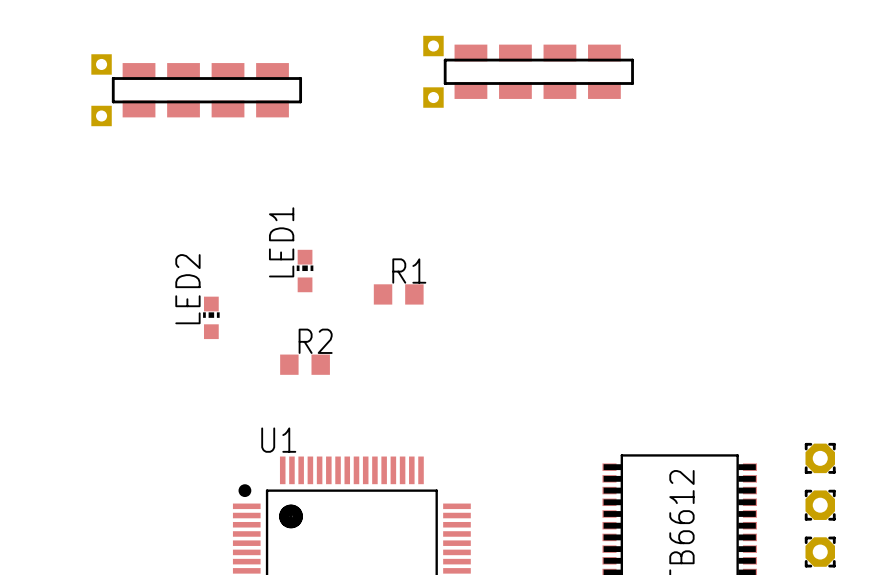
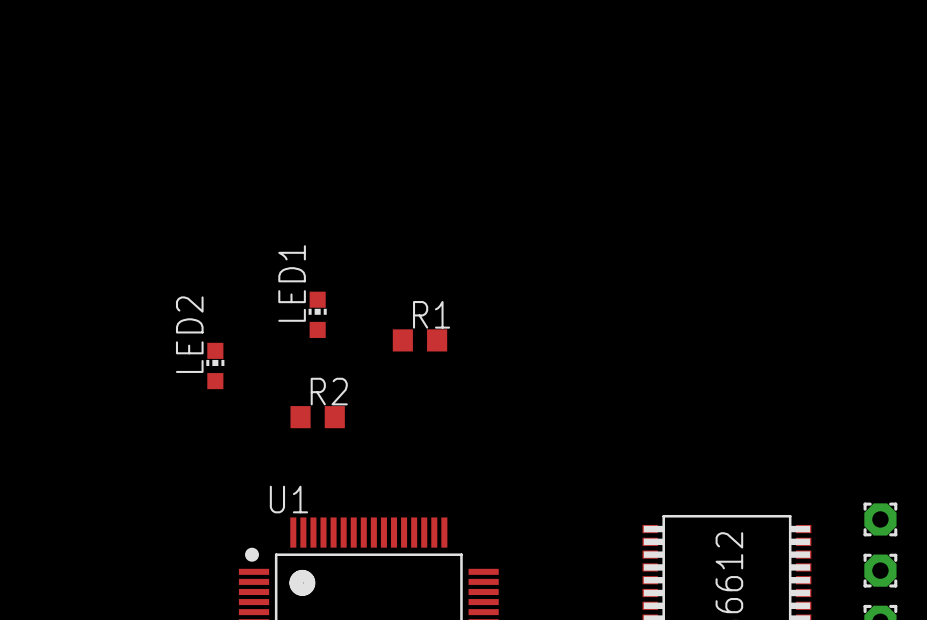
part: (528, 71) -> none
part: (196, 90) -> none

